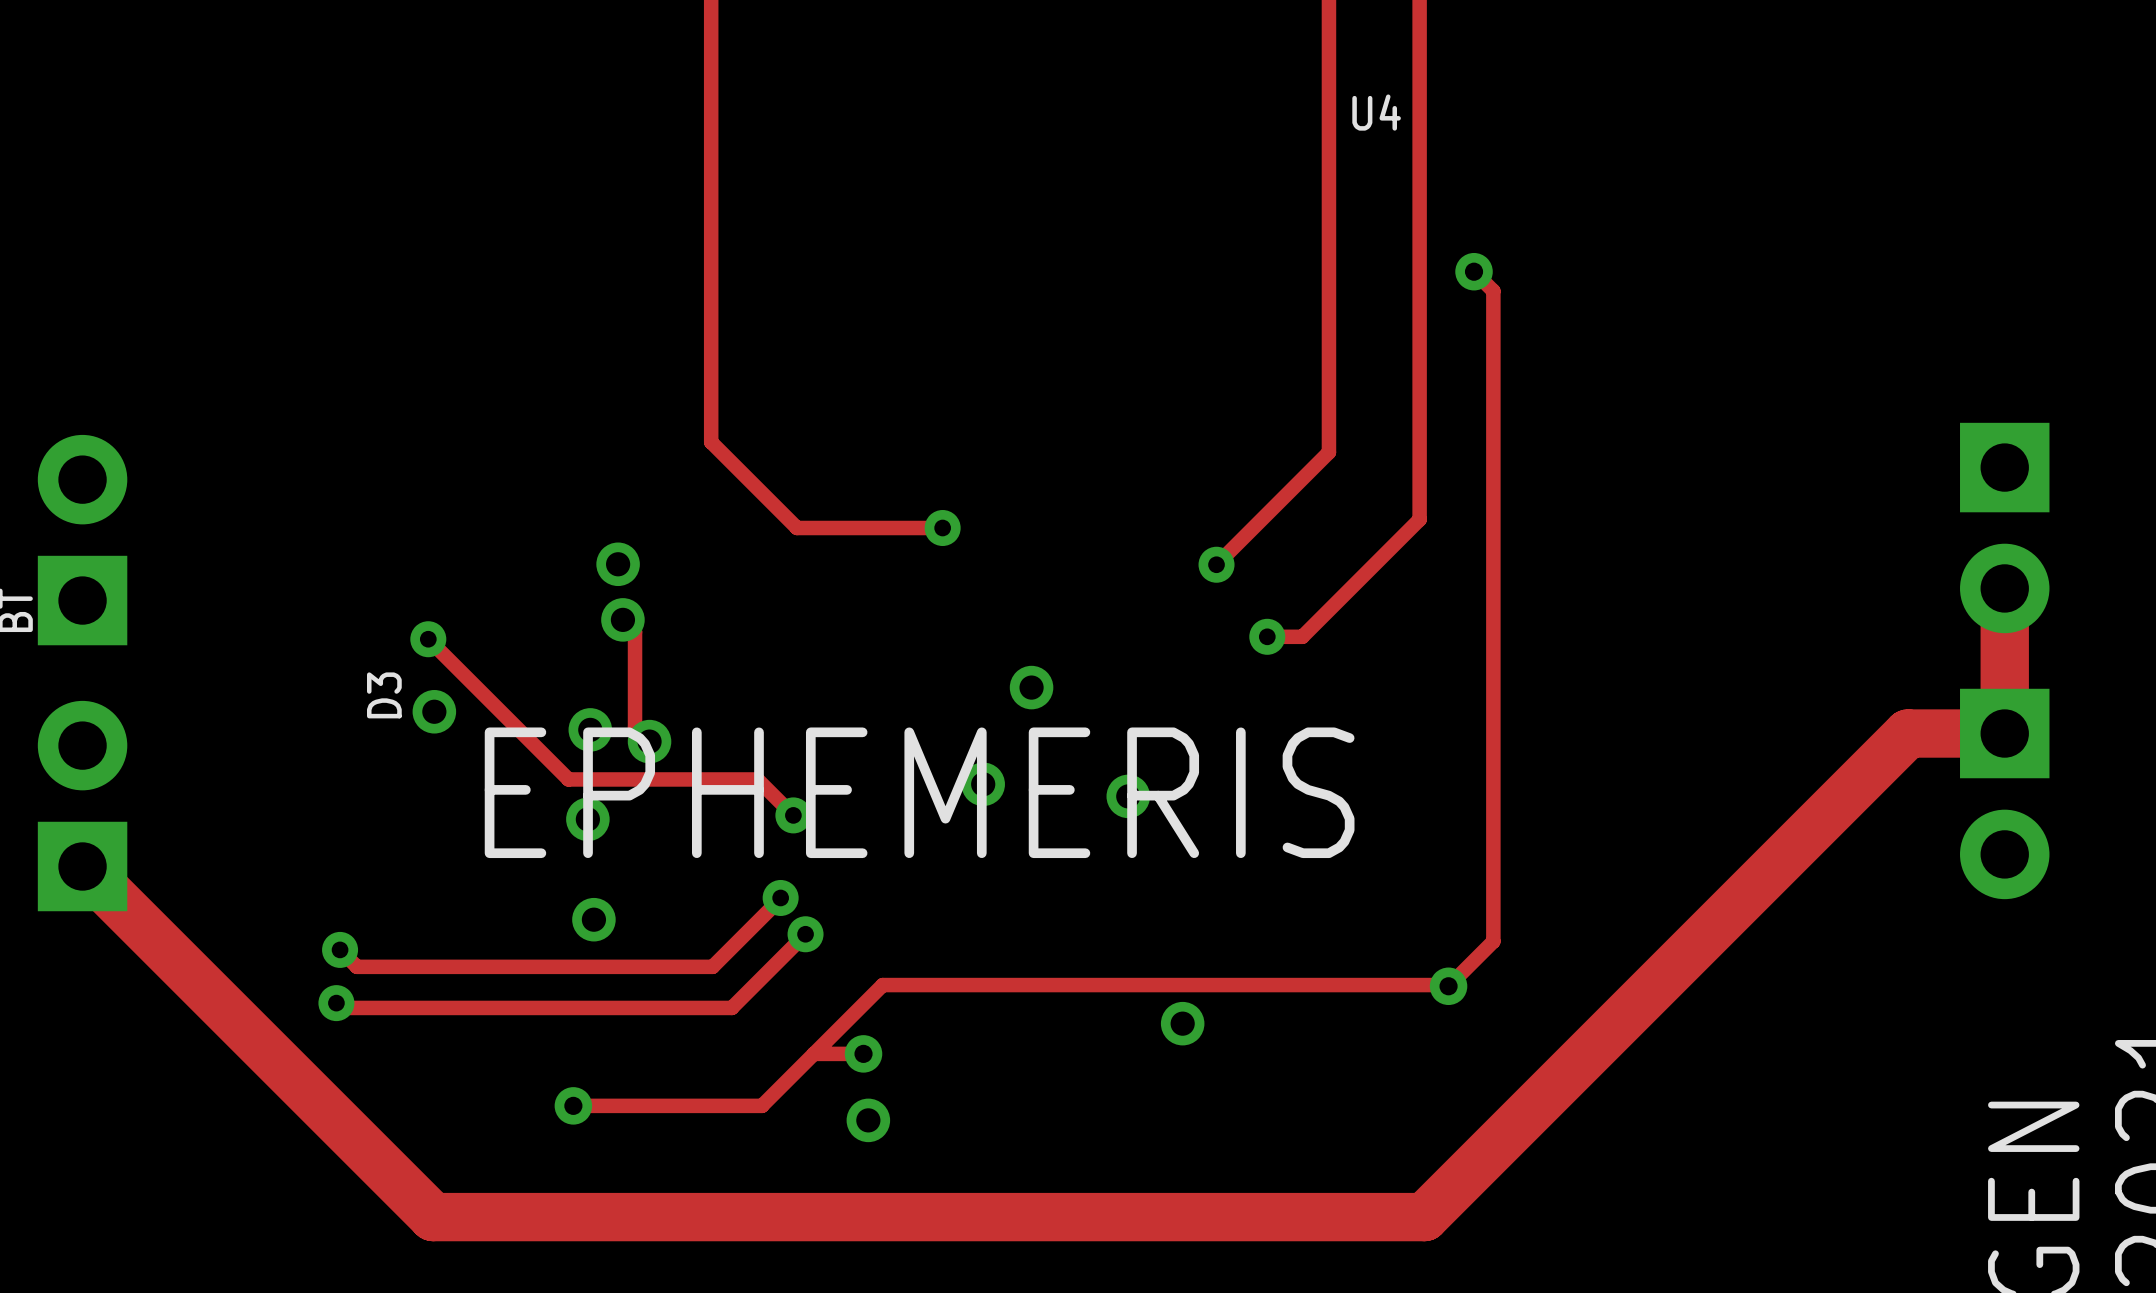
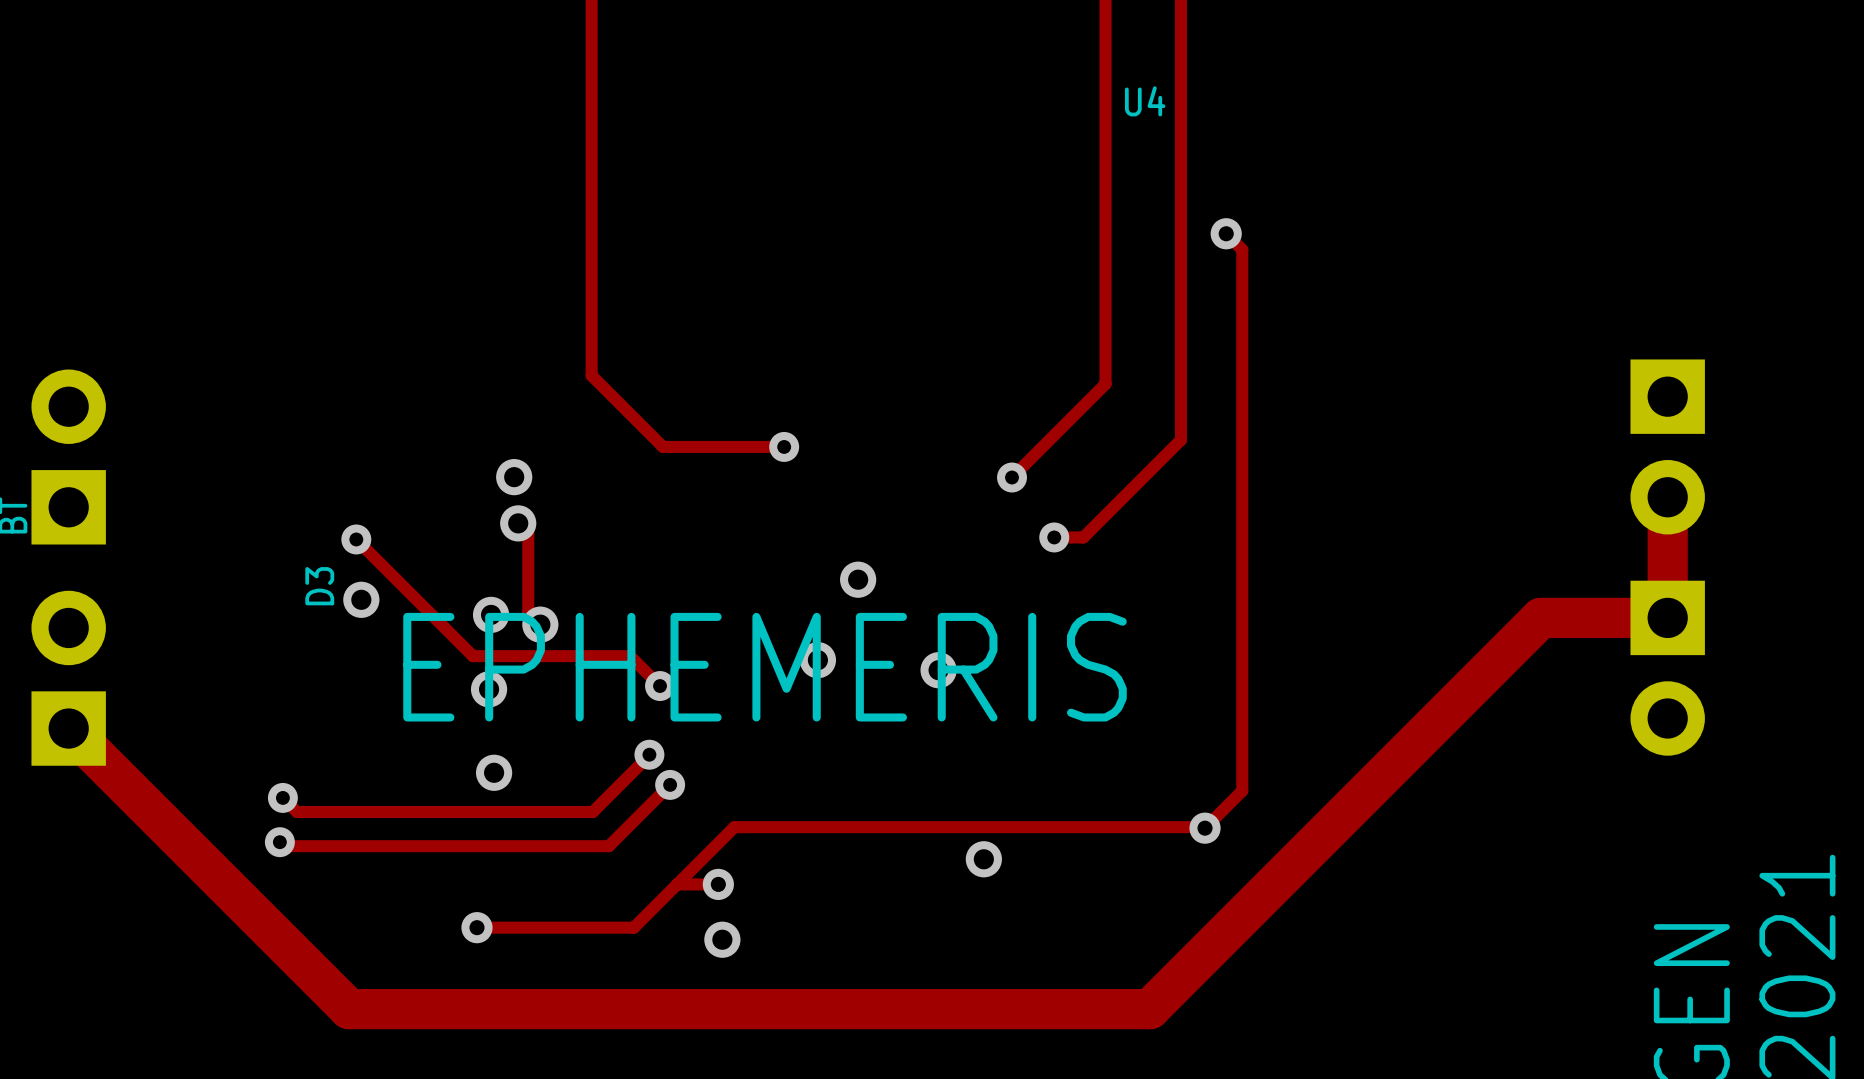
track: (1908, 733) (1424, 1217) (433, 1217) (419, 1203) -> (1587, 617) (1540, 617) (1149, 1009) (349, 1009)

